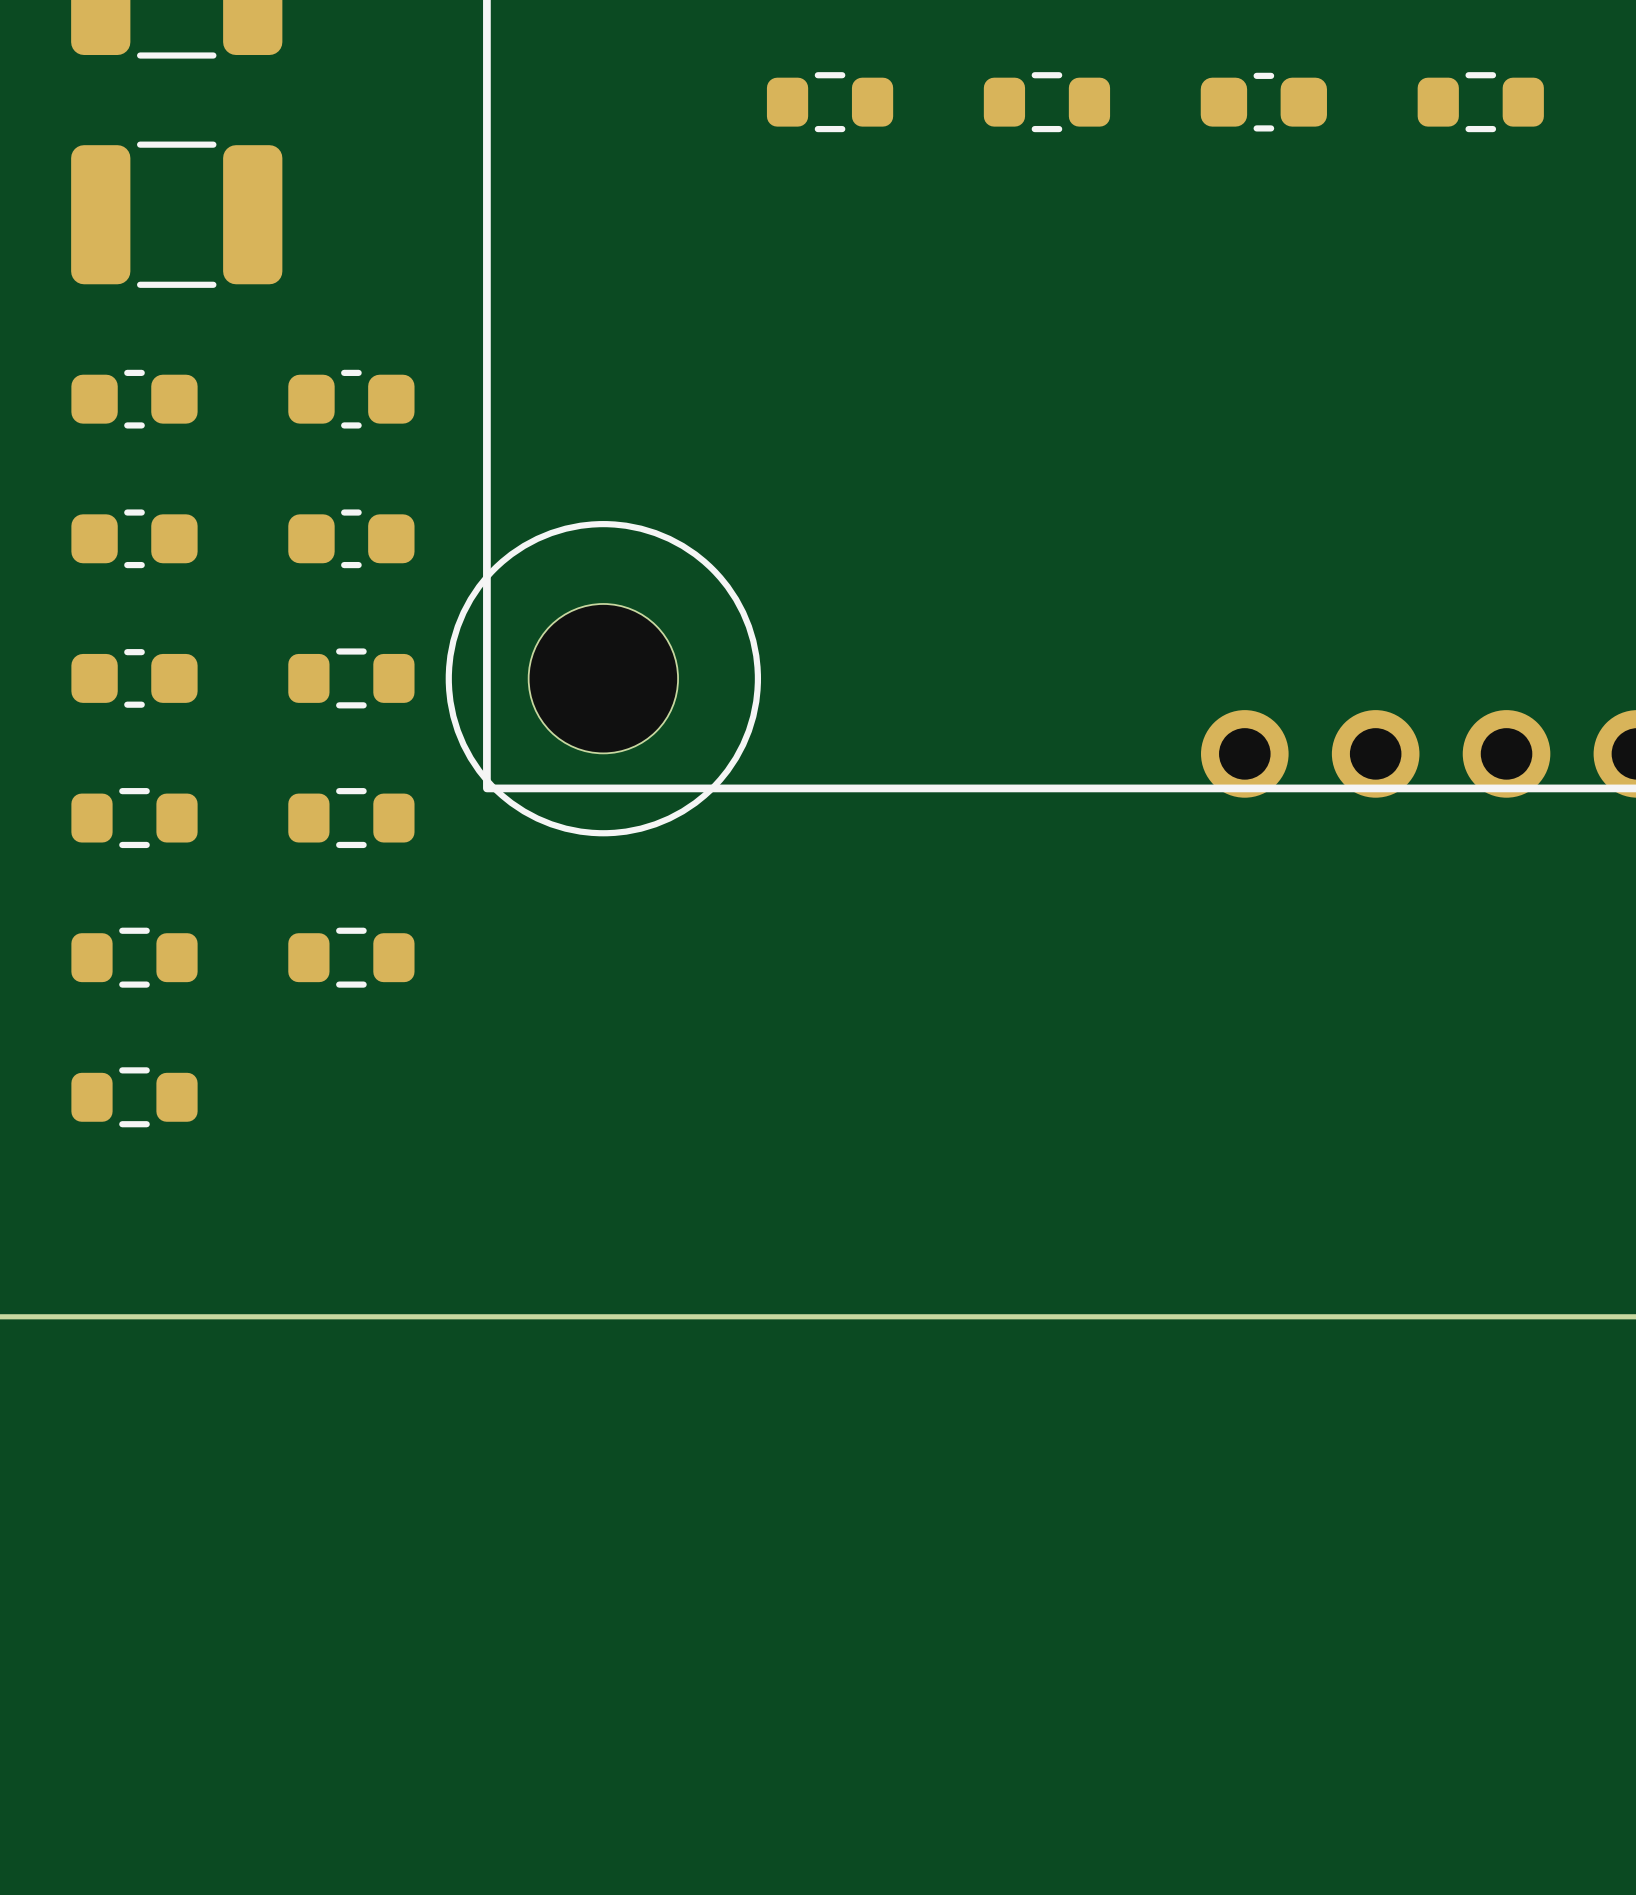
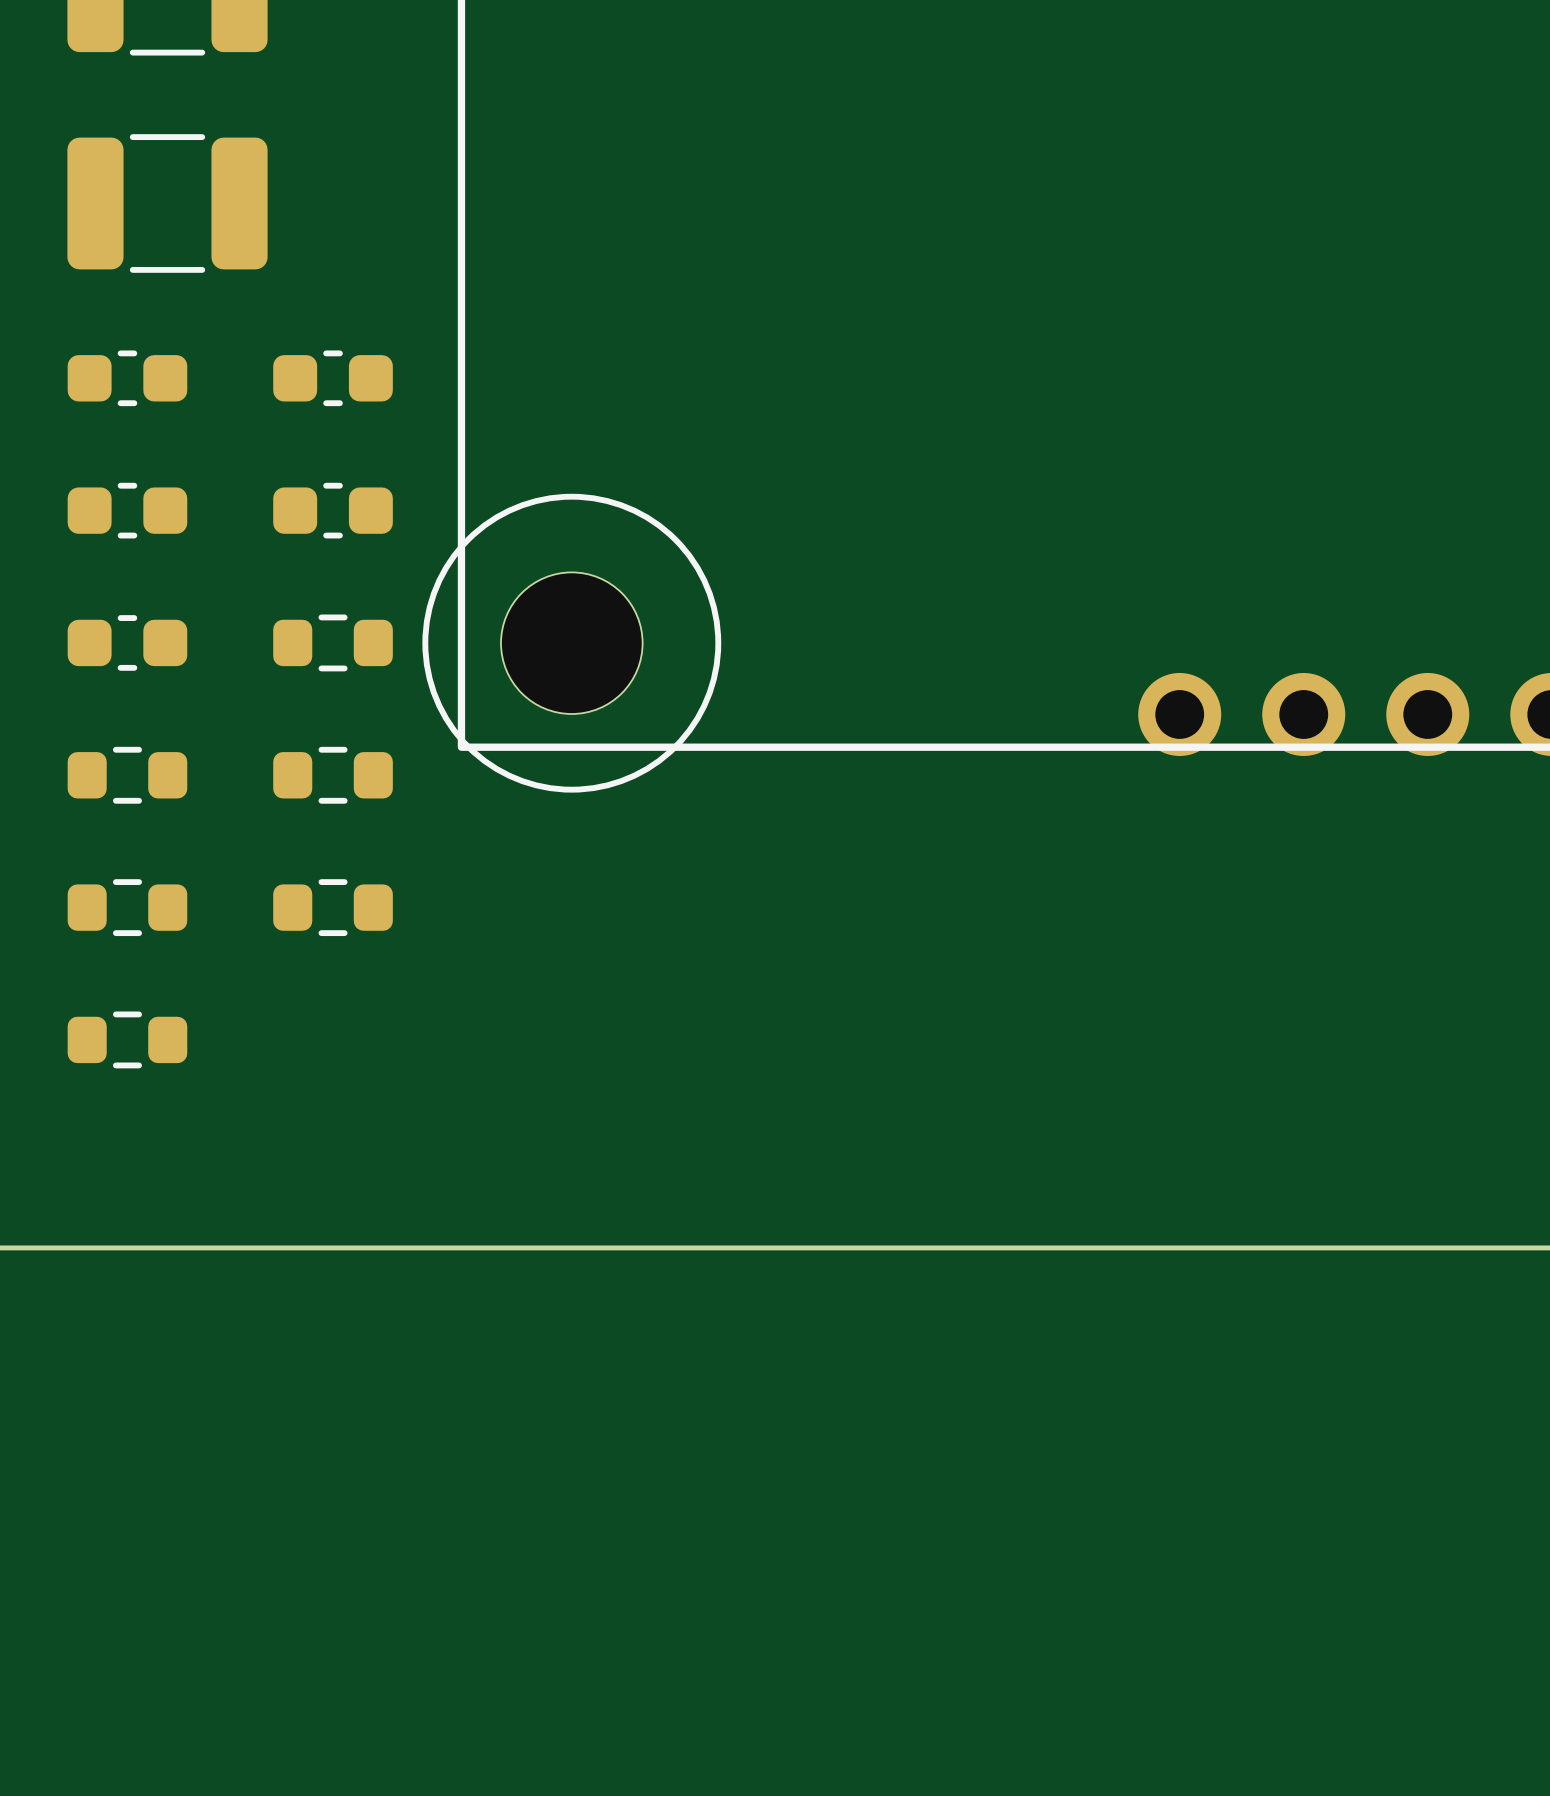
part: (830, 102) -> none
part: (1046, 102) -> none
part: (1263, 102) -> none
part: (1480, 102) -> none

